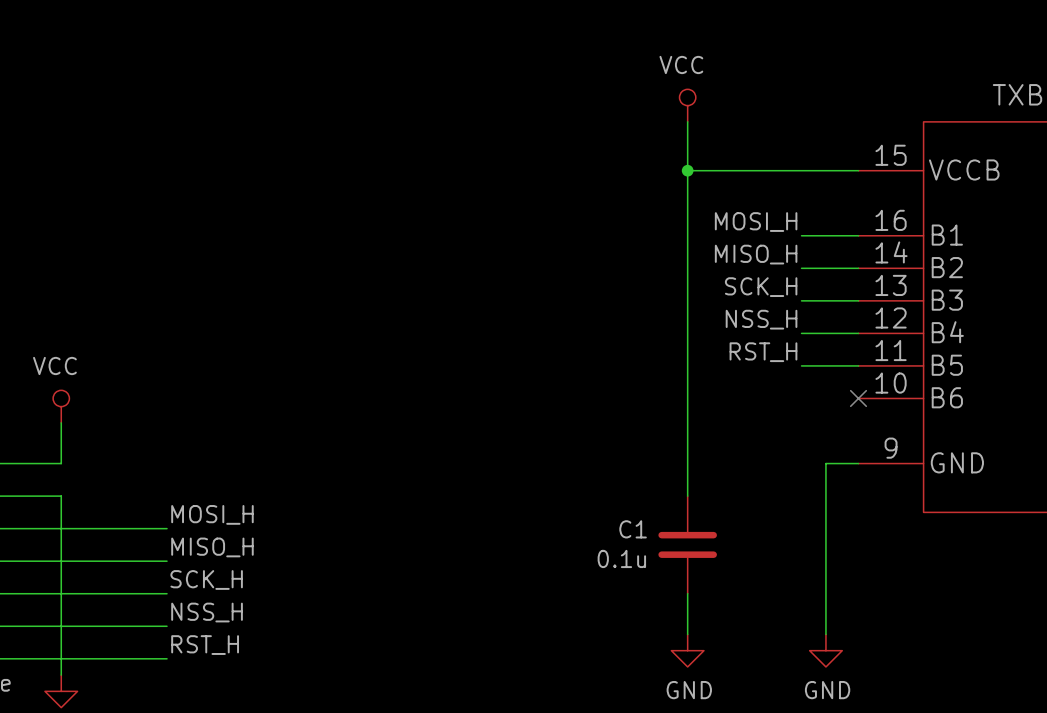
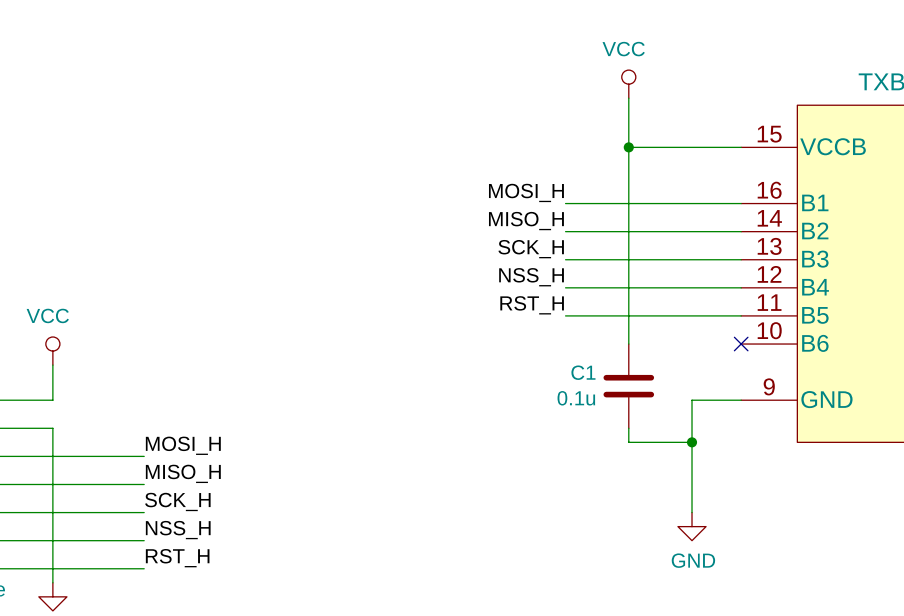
power symbol position: VCC (687, 105) -> VCC (628, 84)
wire: none -> (628, 98) (628, 344)
wire: (687, 121) (687, 496) -> none
wire: (687, 170) (728, 170) -> none
junction position: (687, 170) -> (628, 147)
label position: MOSI_H (756, 222) -> MOSI_H (526, 192)
wire: none -> (565, 203) (692, 203)
label position: MISO_H (756, 254) -> MISO_H (526, 221)
wire: none -> (565, 231) (692, 231)
label position: SCK_H (761, 287) -> SCK_H (531, 249)
wire: none -> (565, 259) (692, 259)
label position: NSS_H (761, 319) -> NSS_H (531, 277)
wire: none -> (565, 287) (692, 287)
label position: RST_H (763, 352) -> RST_H (532, 305)
wire: none -> (565, 315) (692, 315)
wire: (825, 463) (825, 634) -> (713, 400) (692, 400) (692, 512)
wire: none -> (628, 428) (628, 442) (692, 442)
junction: none -> (692, 442)
C1 position: (687, 544) -> (628, 386)
wire: (687, 593) (687, 634) -> none
power symbol: GND (687, 650) -> none
power symbol position: GND (825, 650) -> GND (692, 526)

